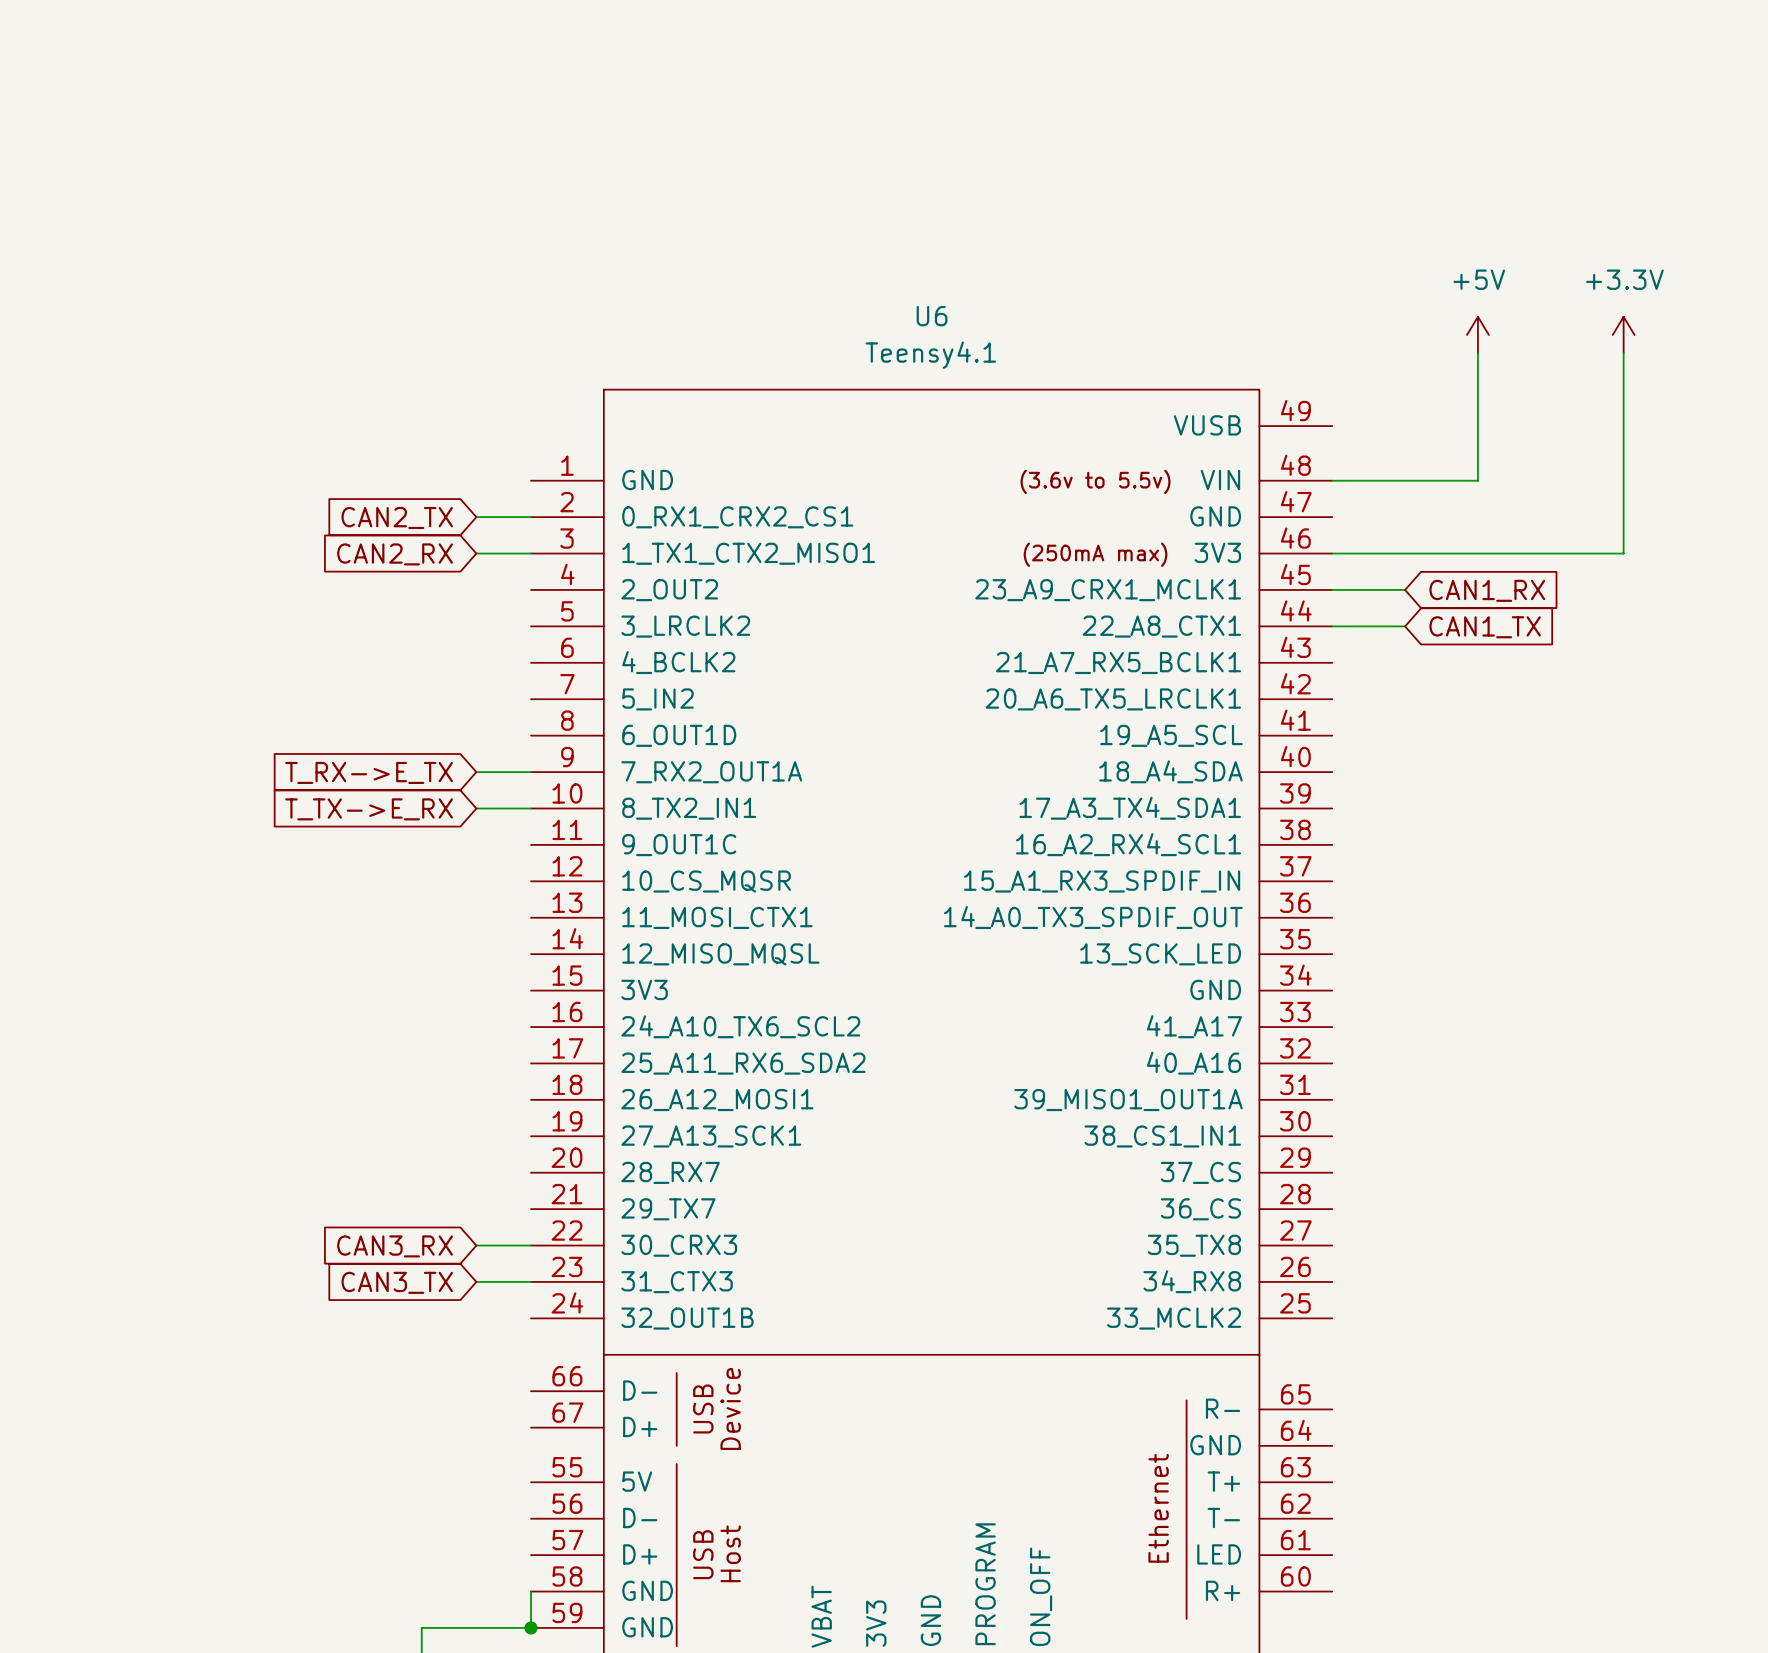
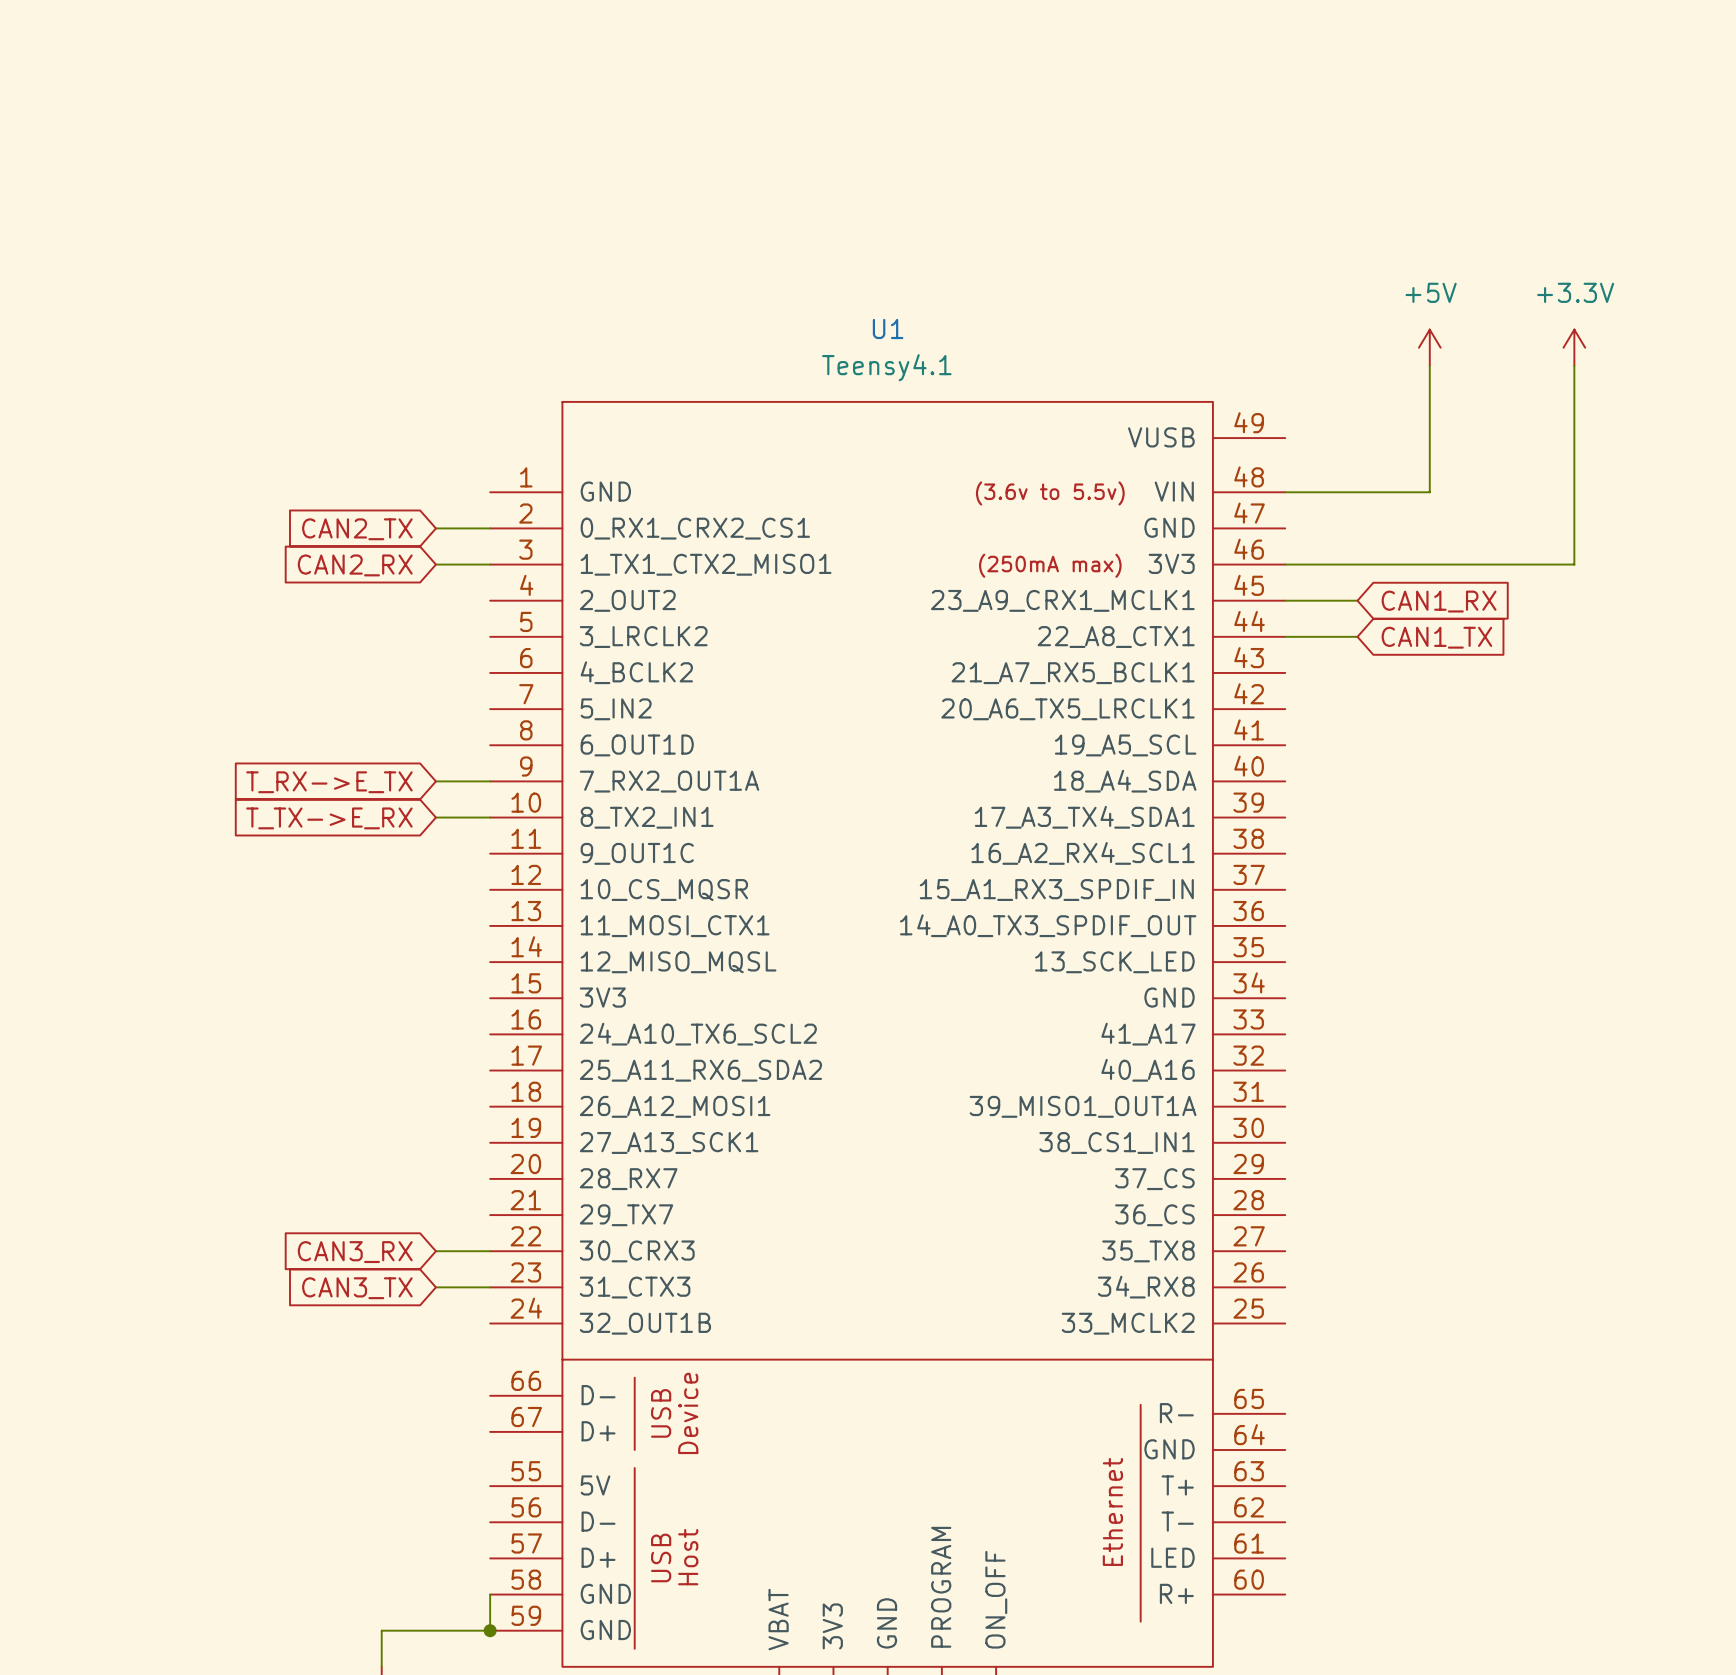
U6 name: U6 (932, 316) -> U1 (888, 328)

